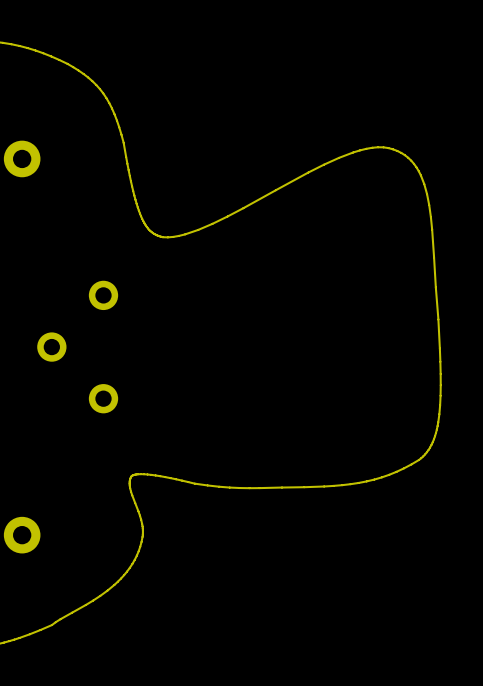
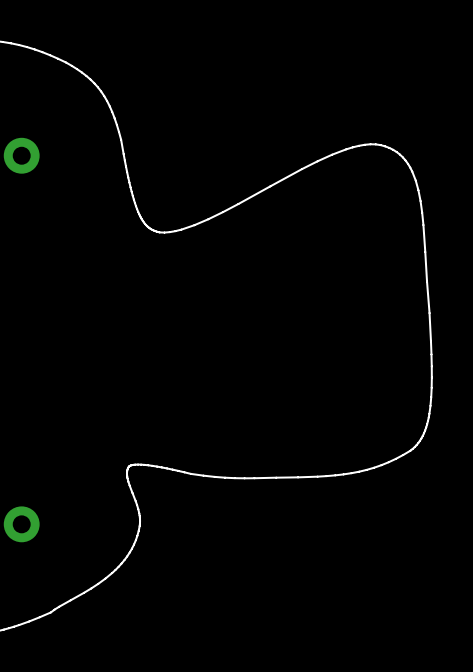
part: (77, 347) -> none

